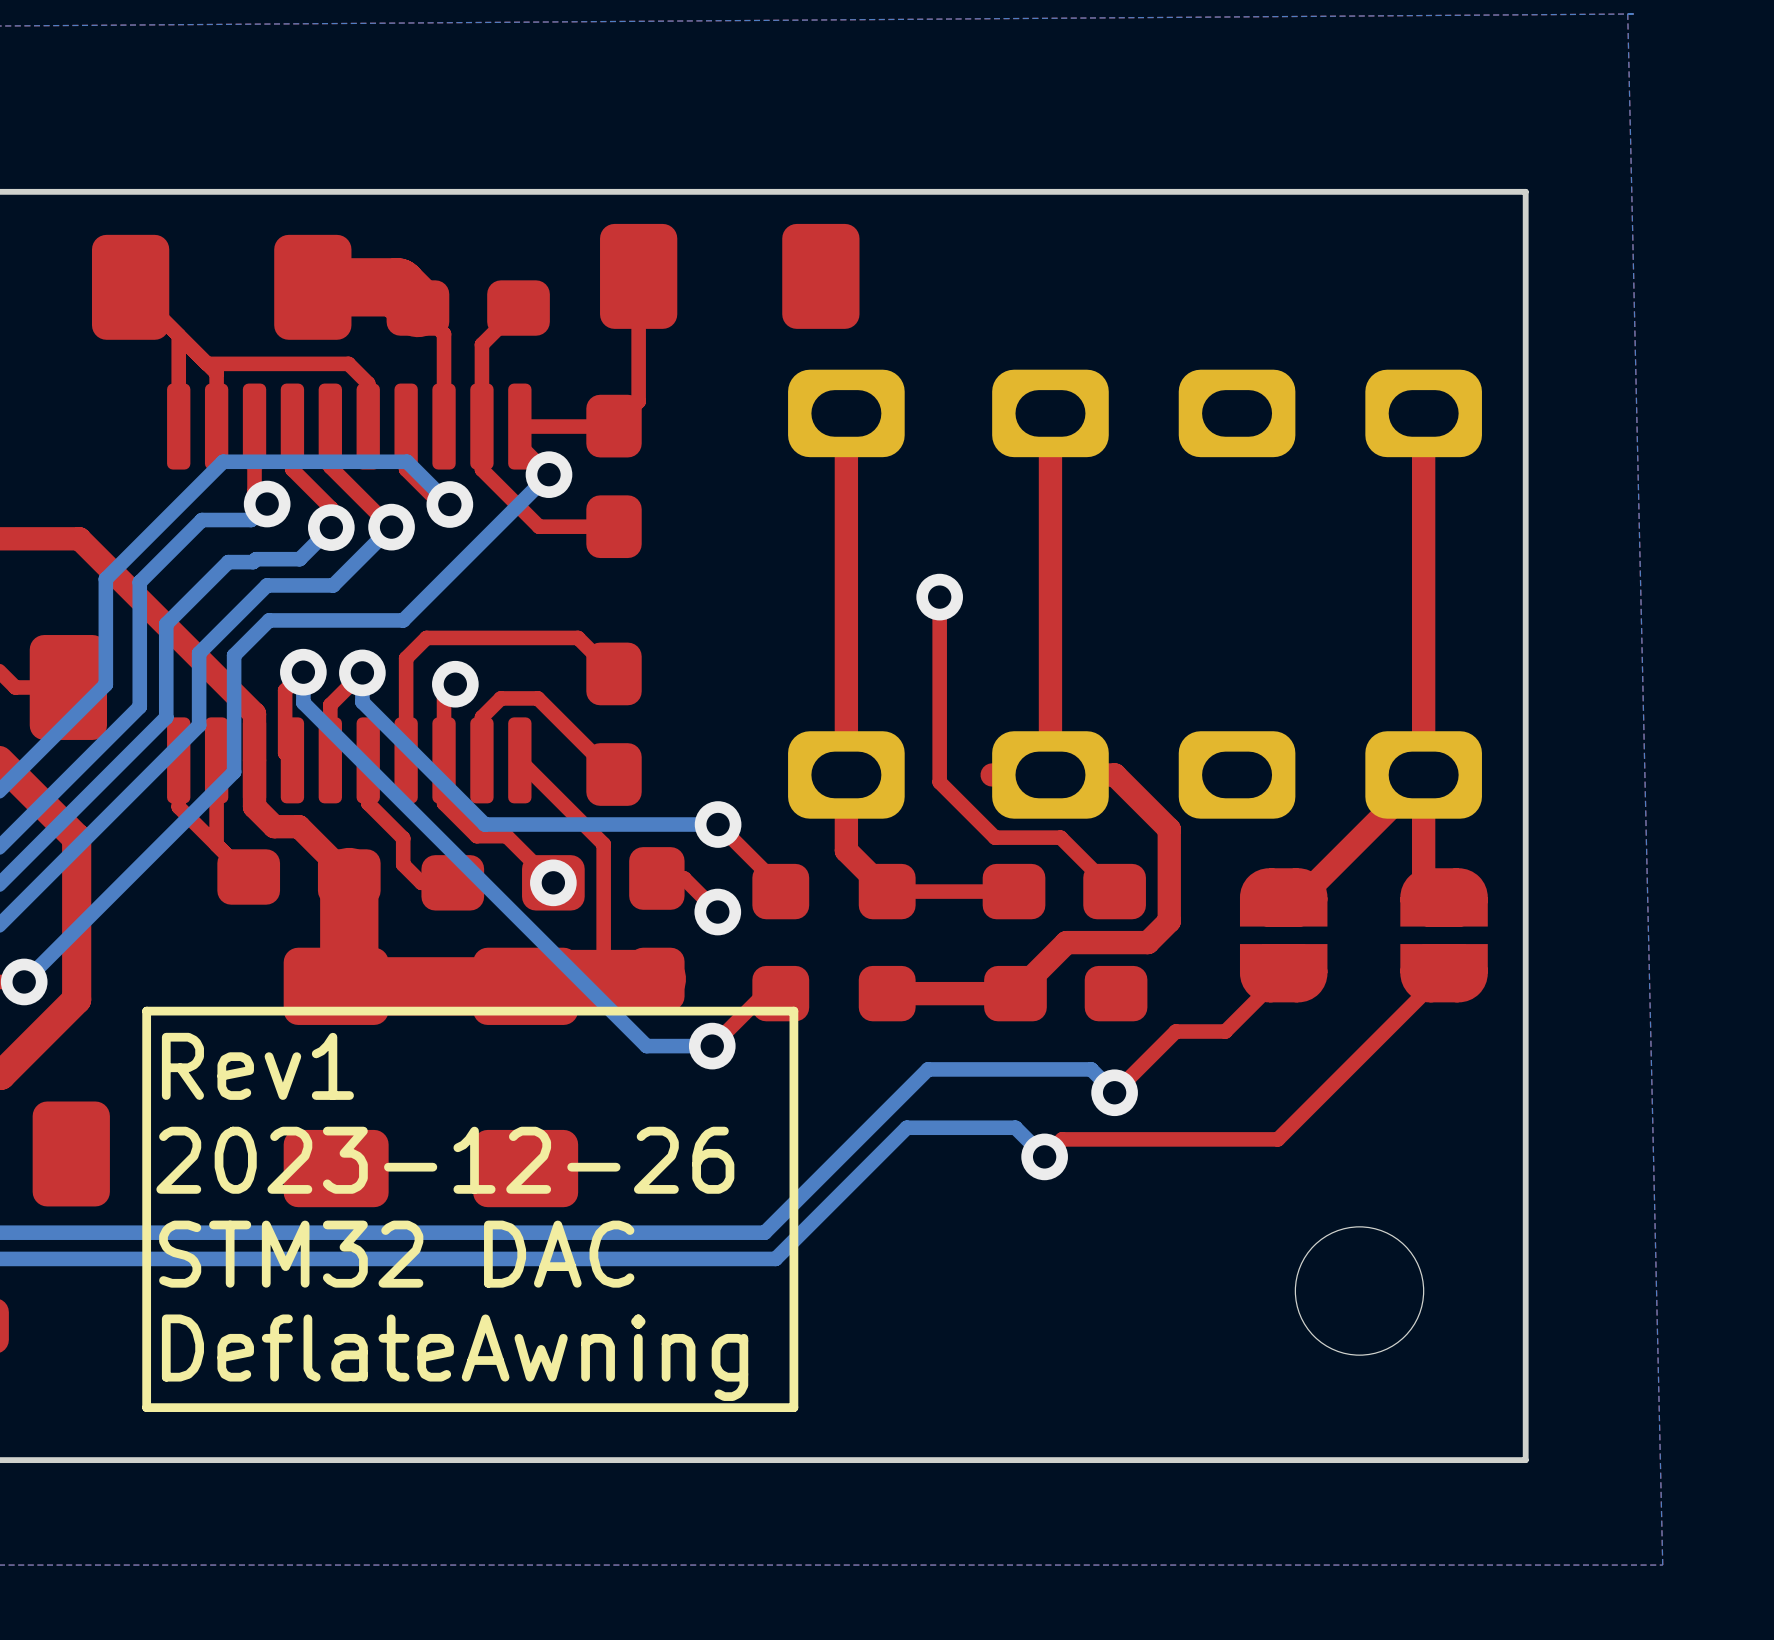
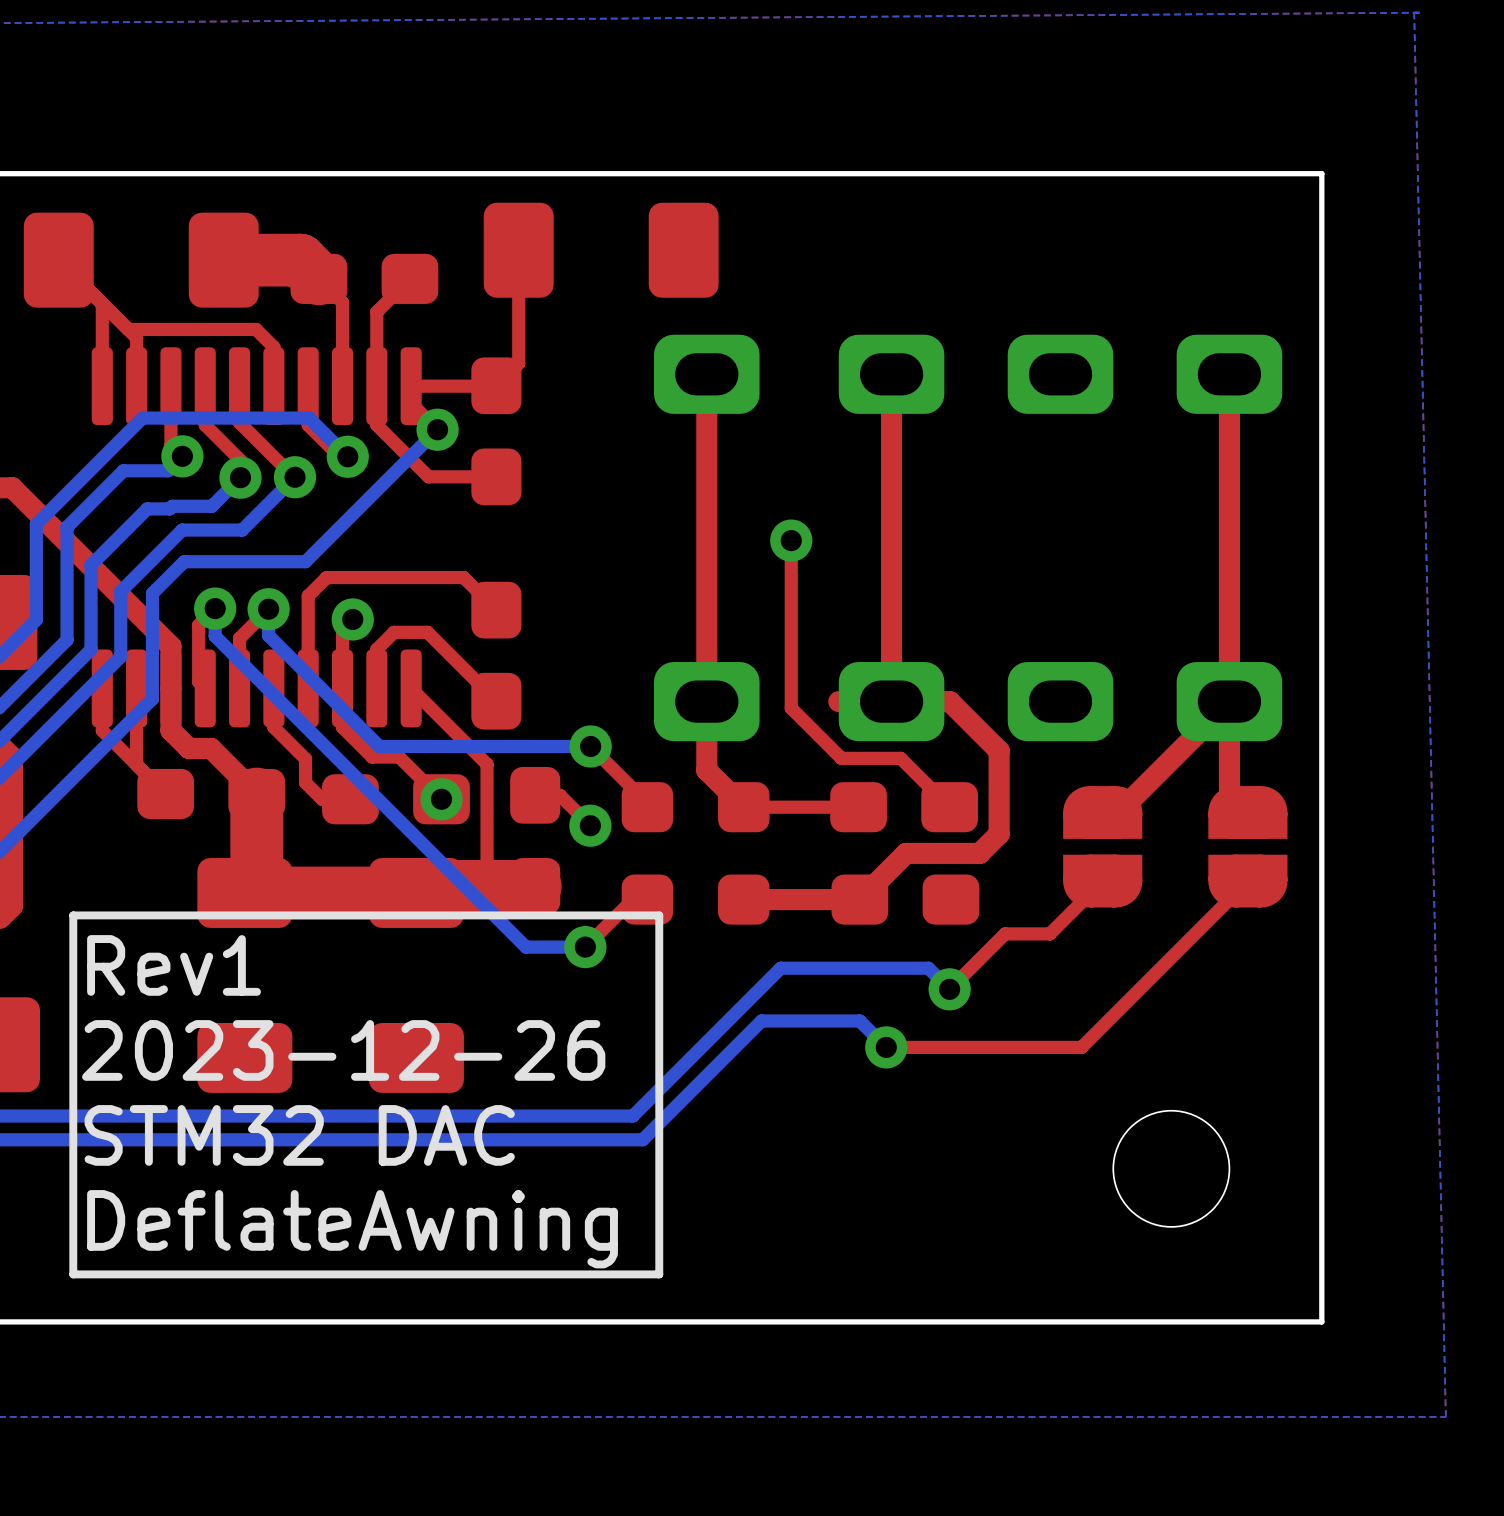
top track: (1277, 1139) (1062, 1139) (1044, 1156) -> (1097, 1031) (1081, 1047) (886, 1047)

